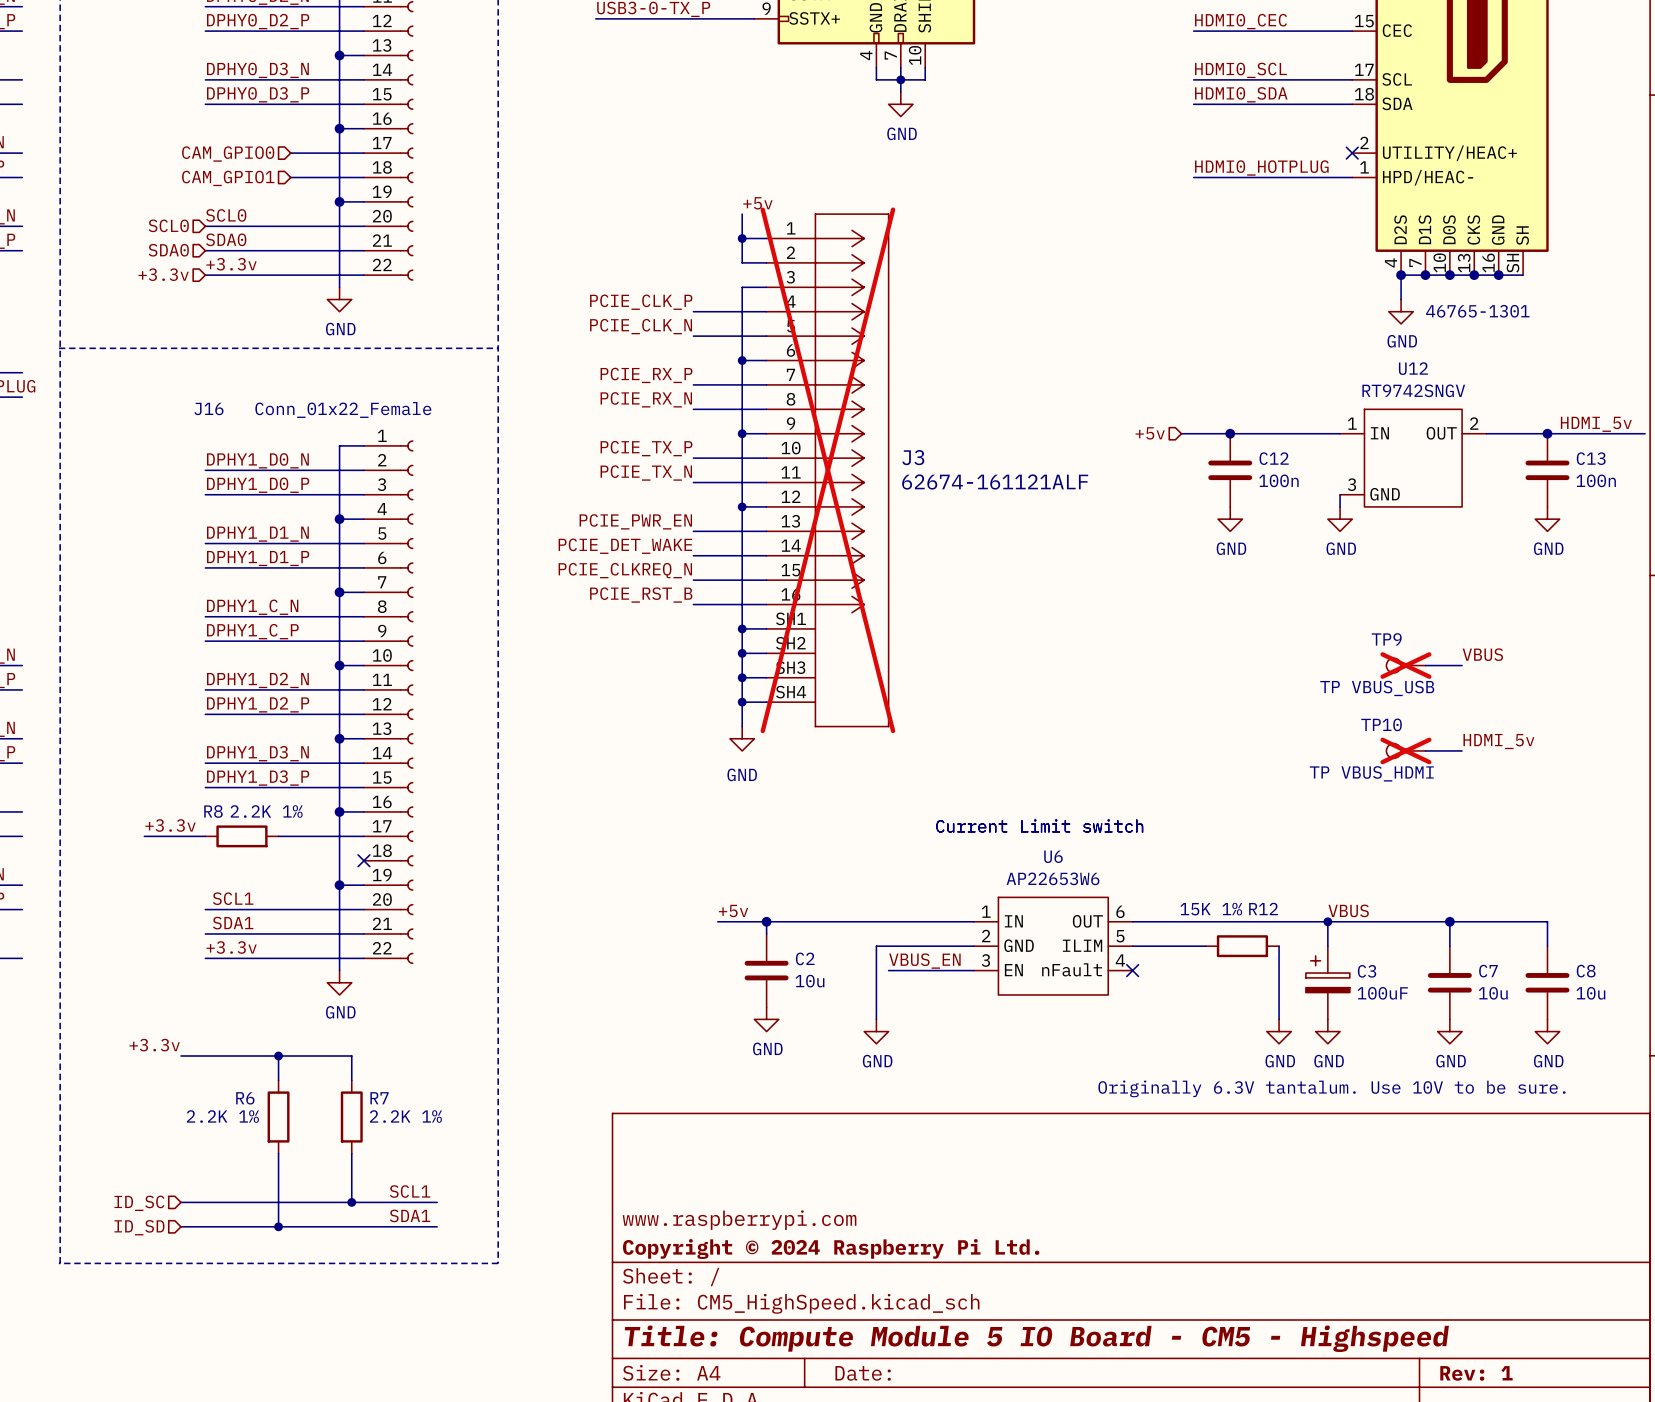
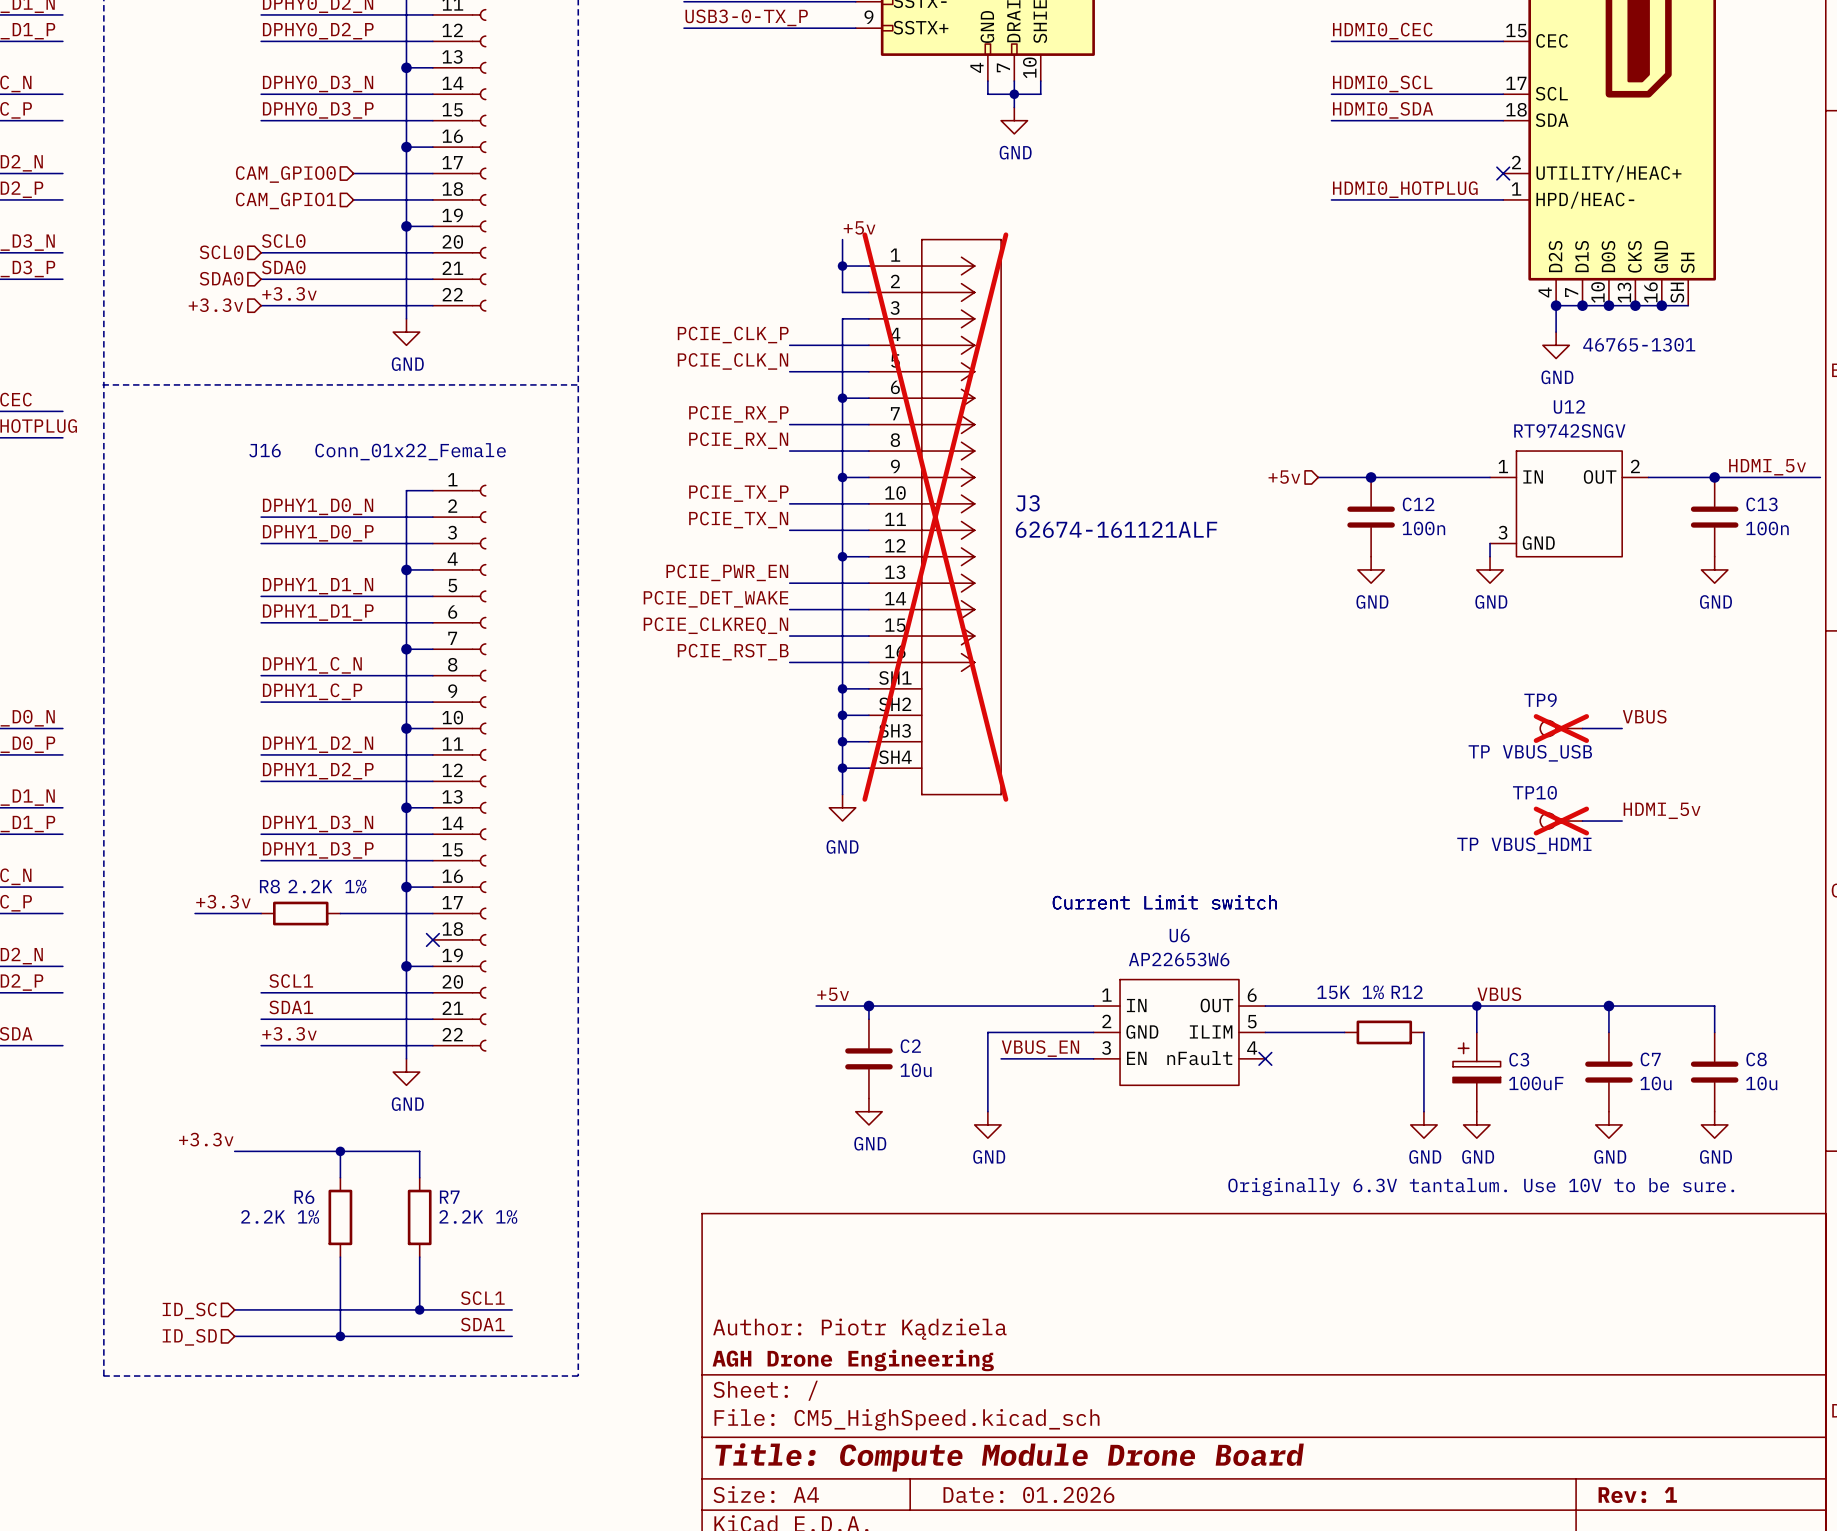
title block: www.raspberrypi.com (739, 1220) -> Author: Piotr Kądziela (859, 1329)
title block: Copyright © 2024 Raspberry Pi Ltd. (831, 1249) -> AGH Drone Engineering (853, 1360)
title block: Title: Compute Module 5 IO Board - CM5 - Highspeed (1036, 1338) -> Title: Compute Module Drone Board (1009, 1457)
title block: Date: (863, 1373) -> Date: 01.2026 (1028, 1494)

